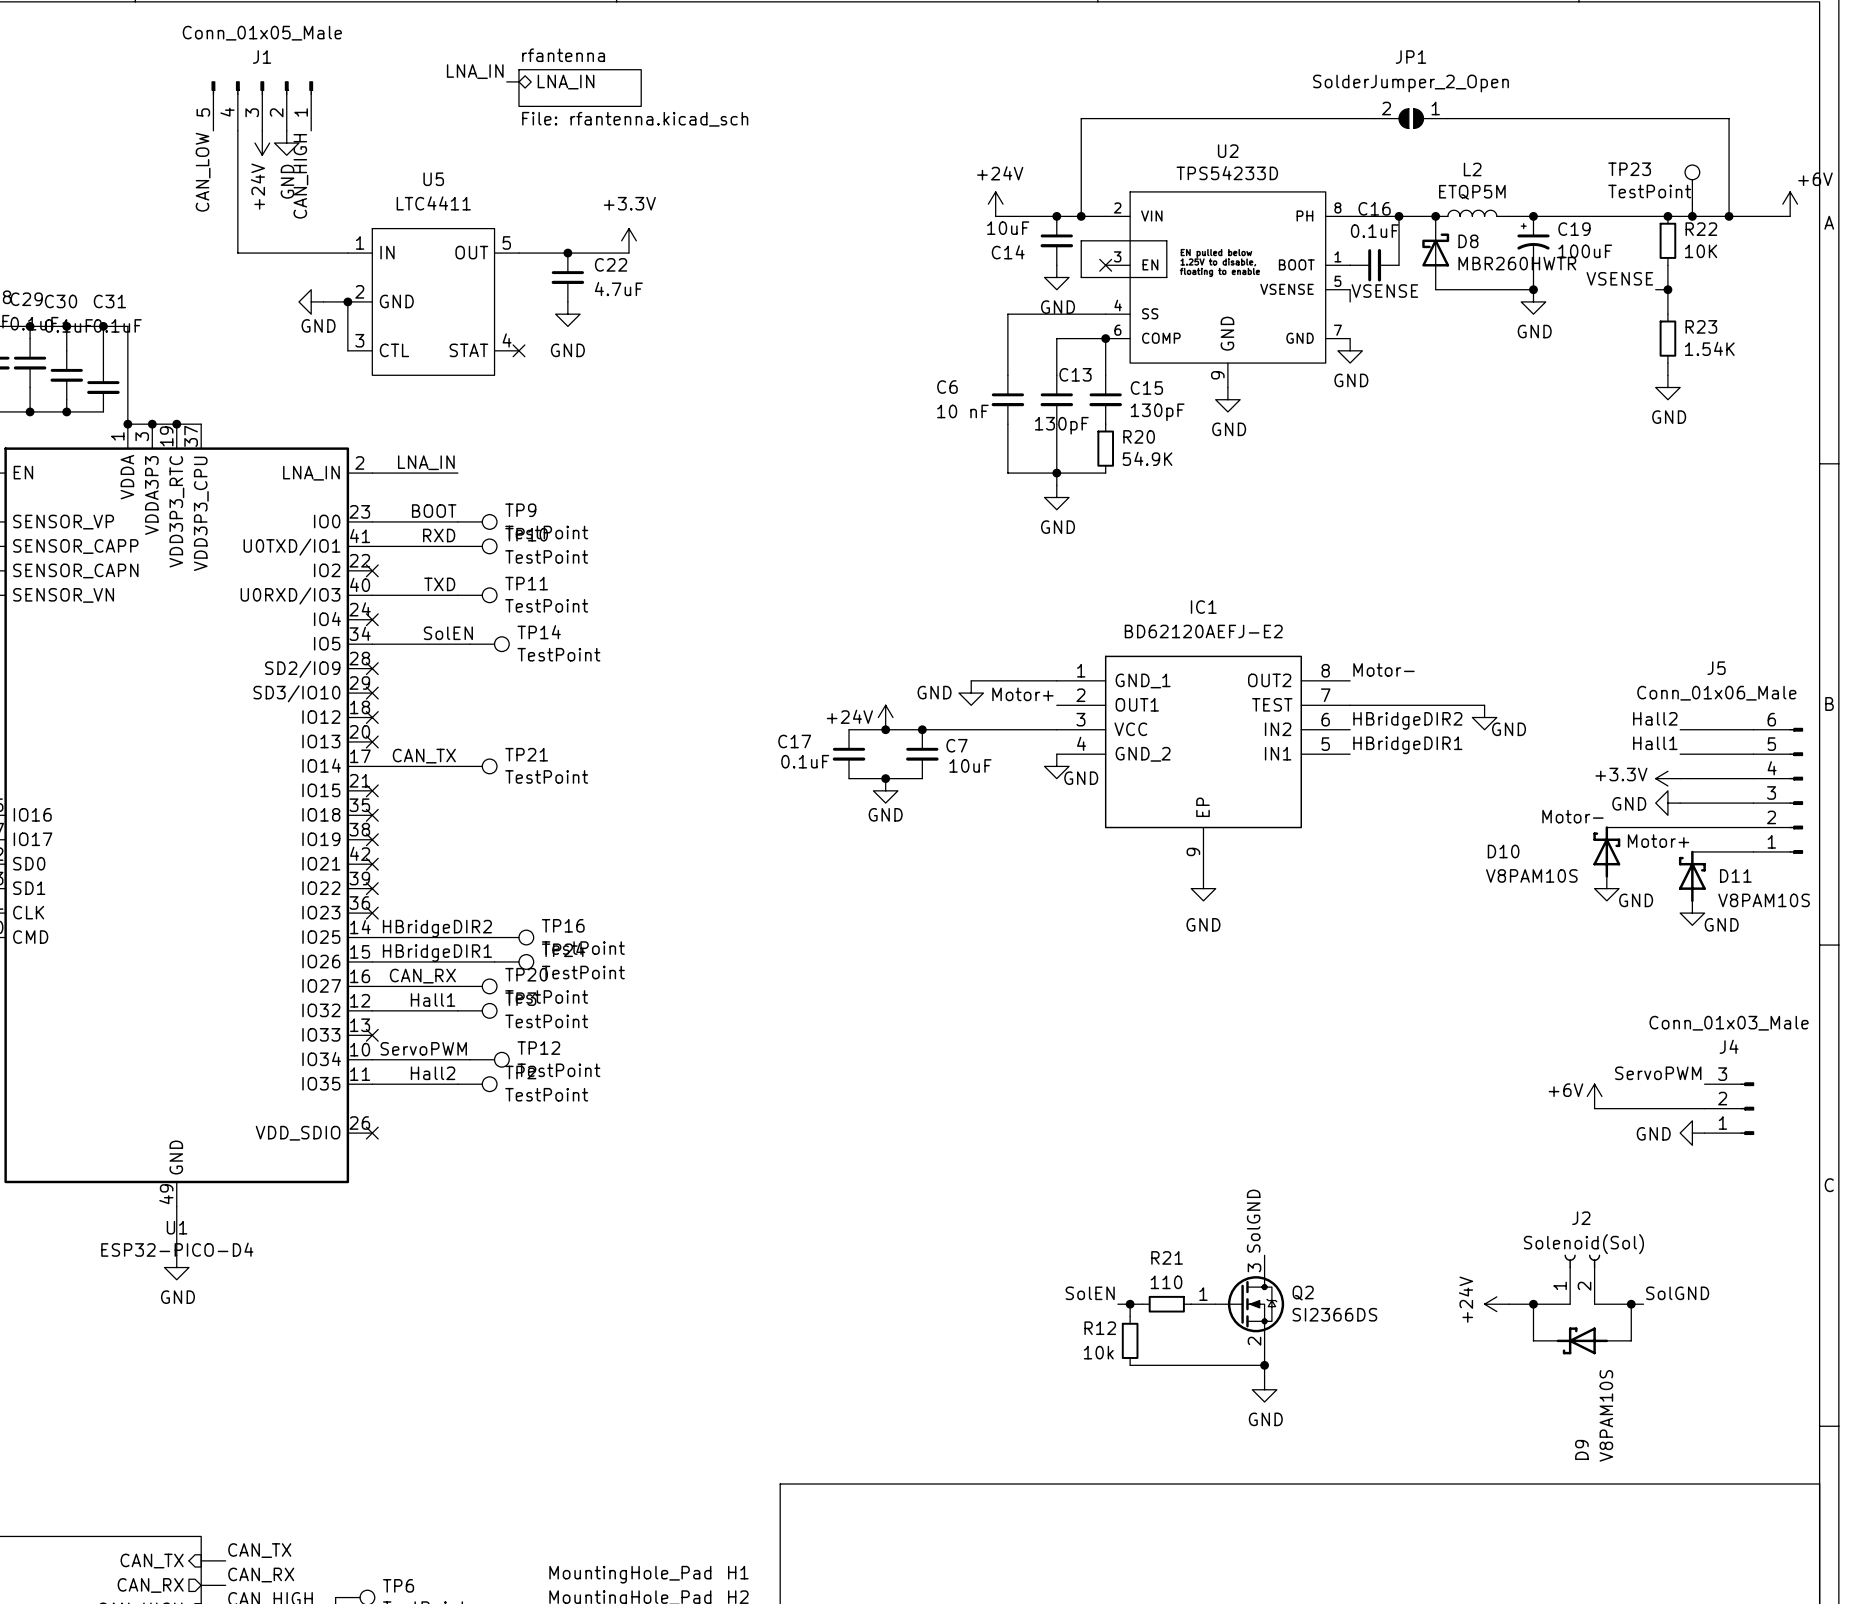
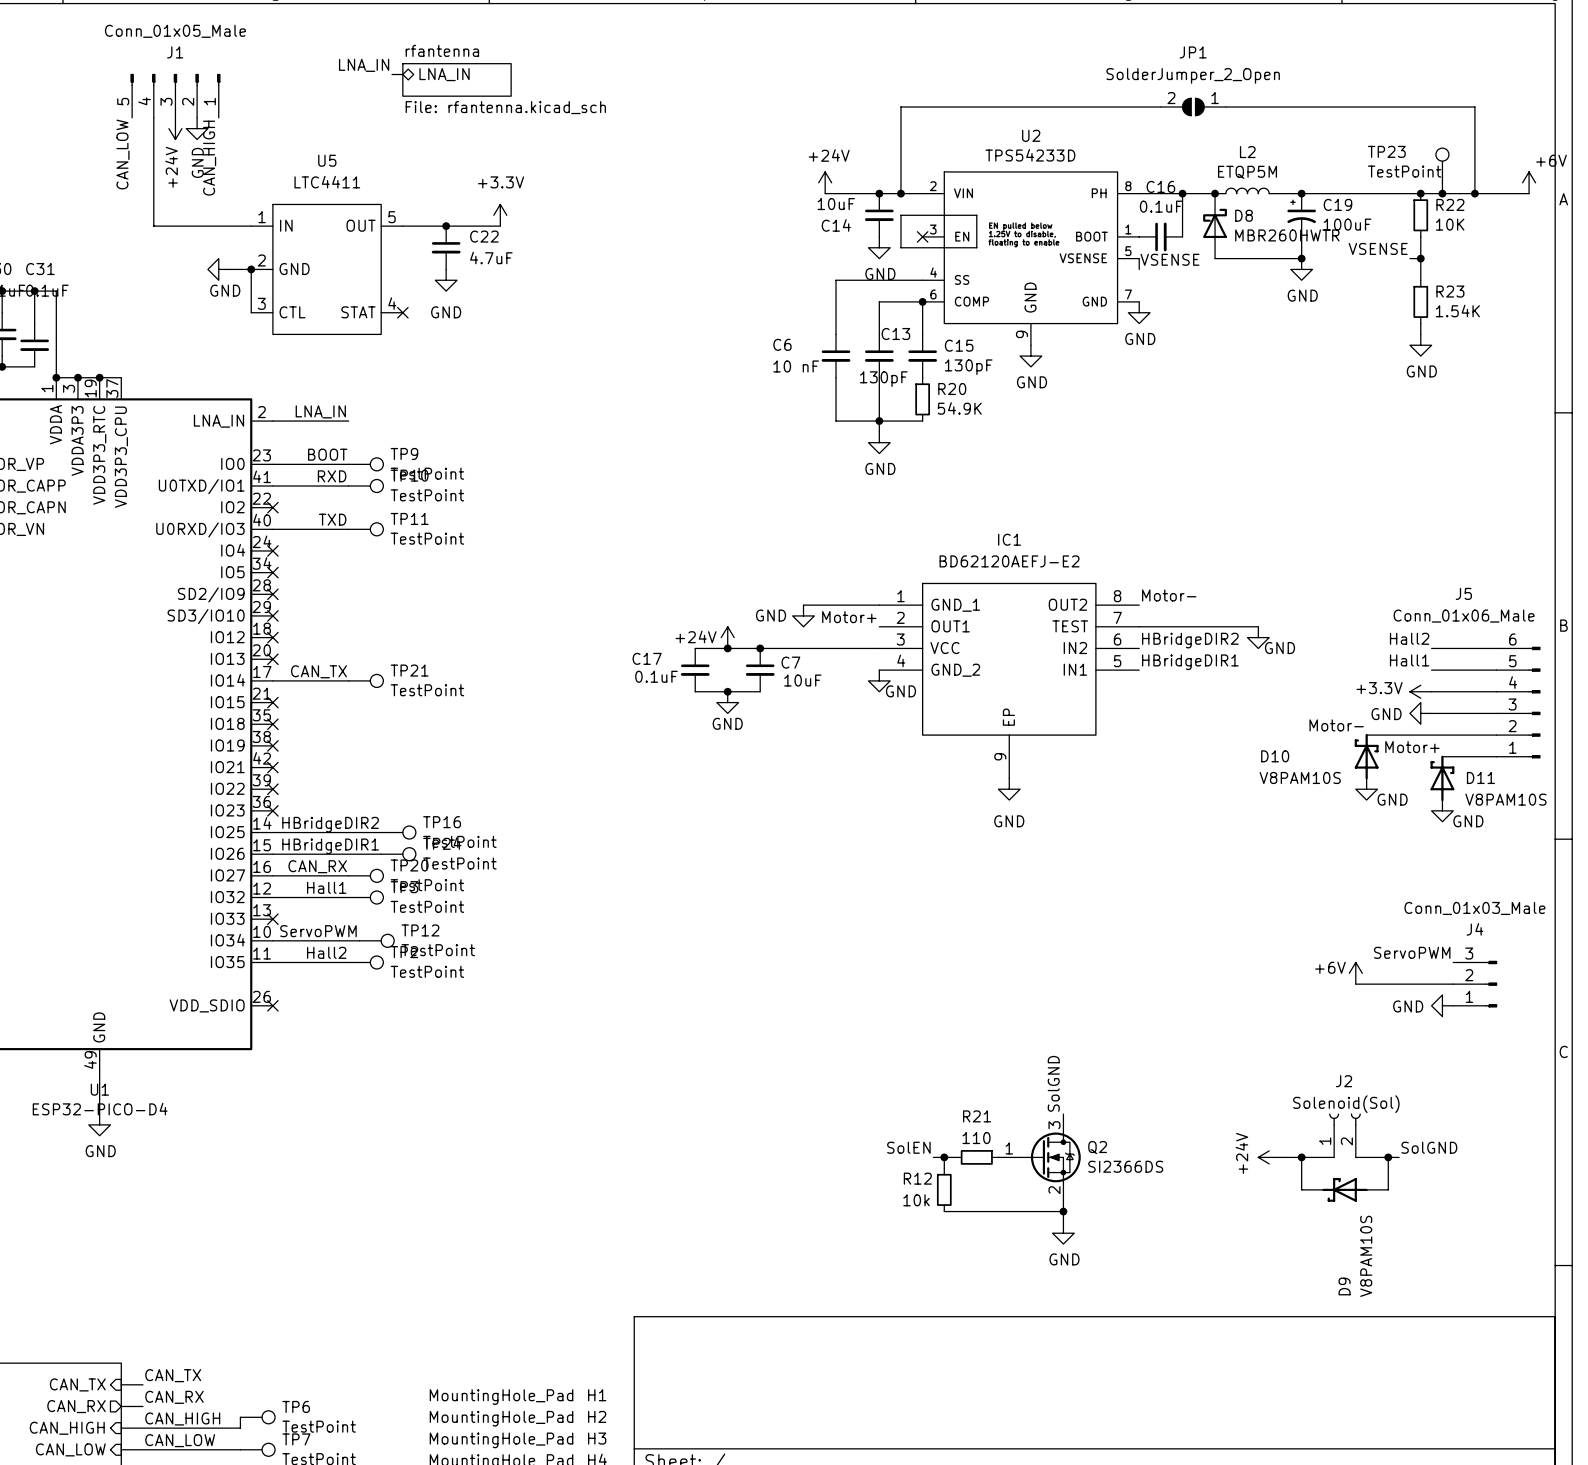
label: SolEN (448, 633) -> none
wire: (372, 644) (470, 644) -> none
no-connect mark: none -> (272, 572)
TP14: TestPoint (489, 644) -> none

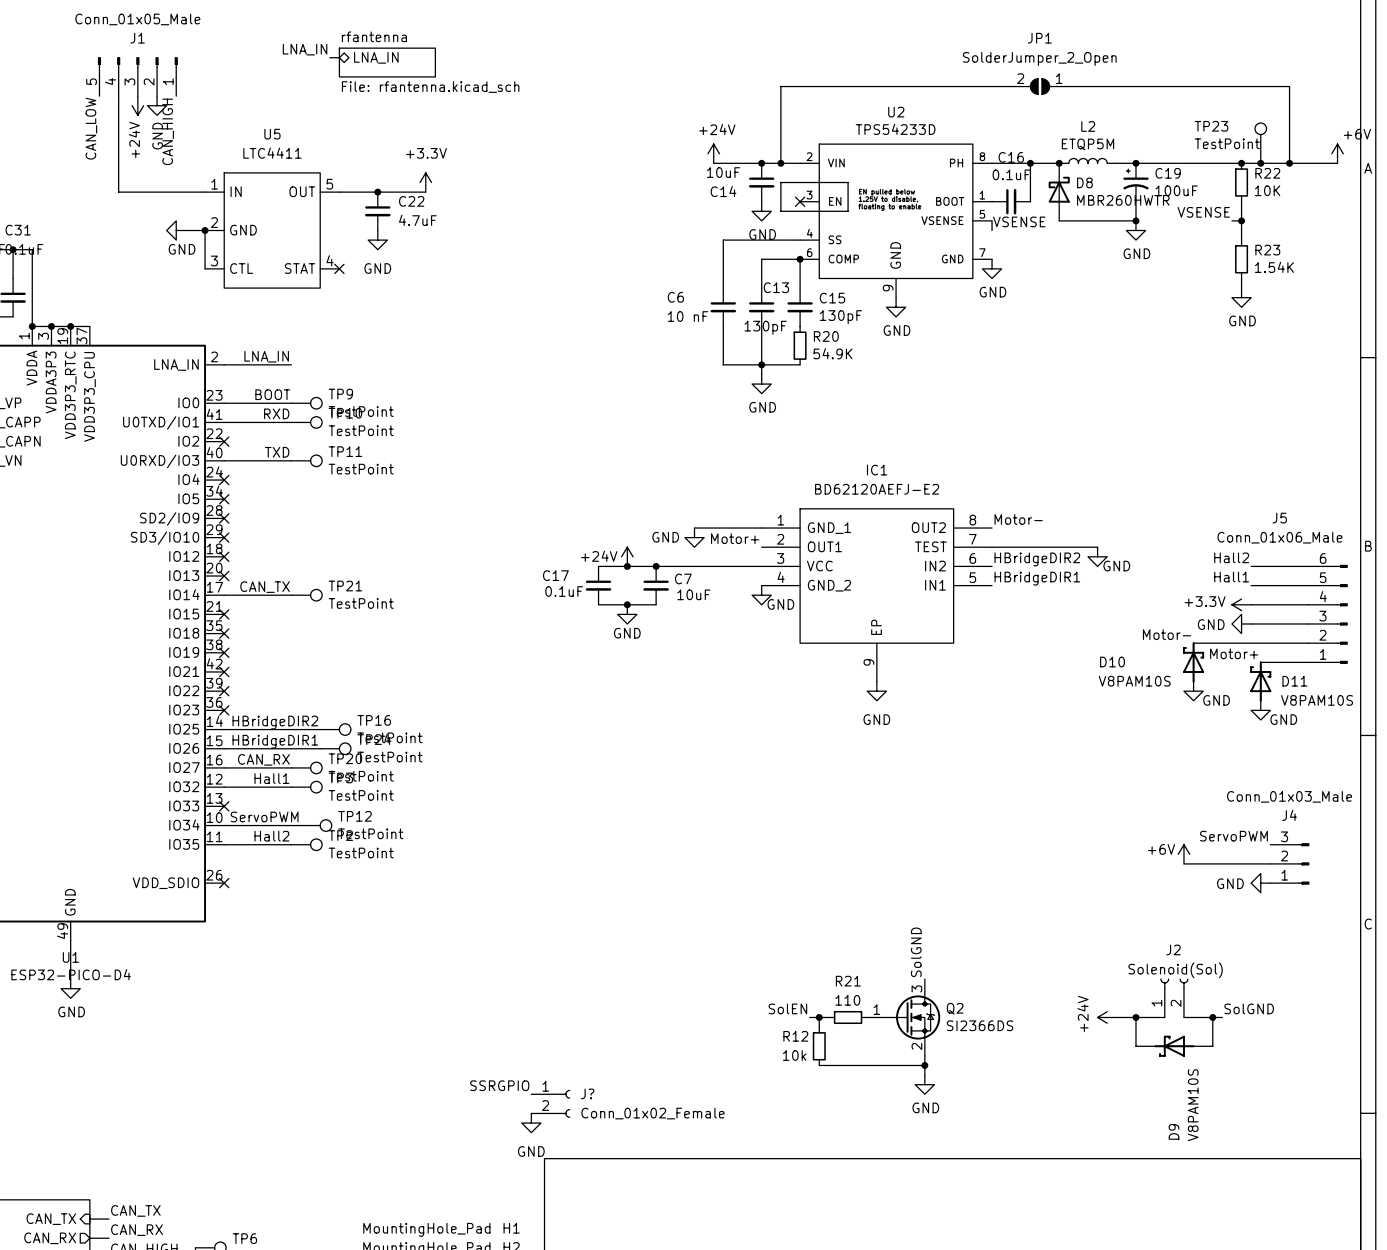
label: none -> SSRGPIO (499, 1085)
J?: none -> Conn_01x02_Female (550, 1103)
power symbol: none -> GND (531, 1123)

